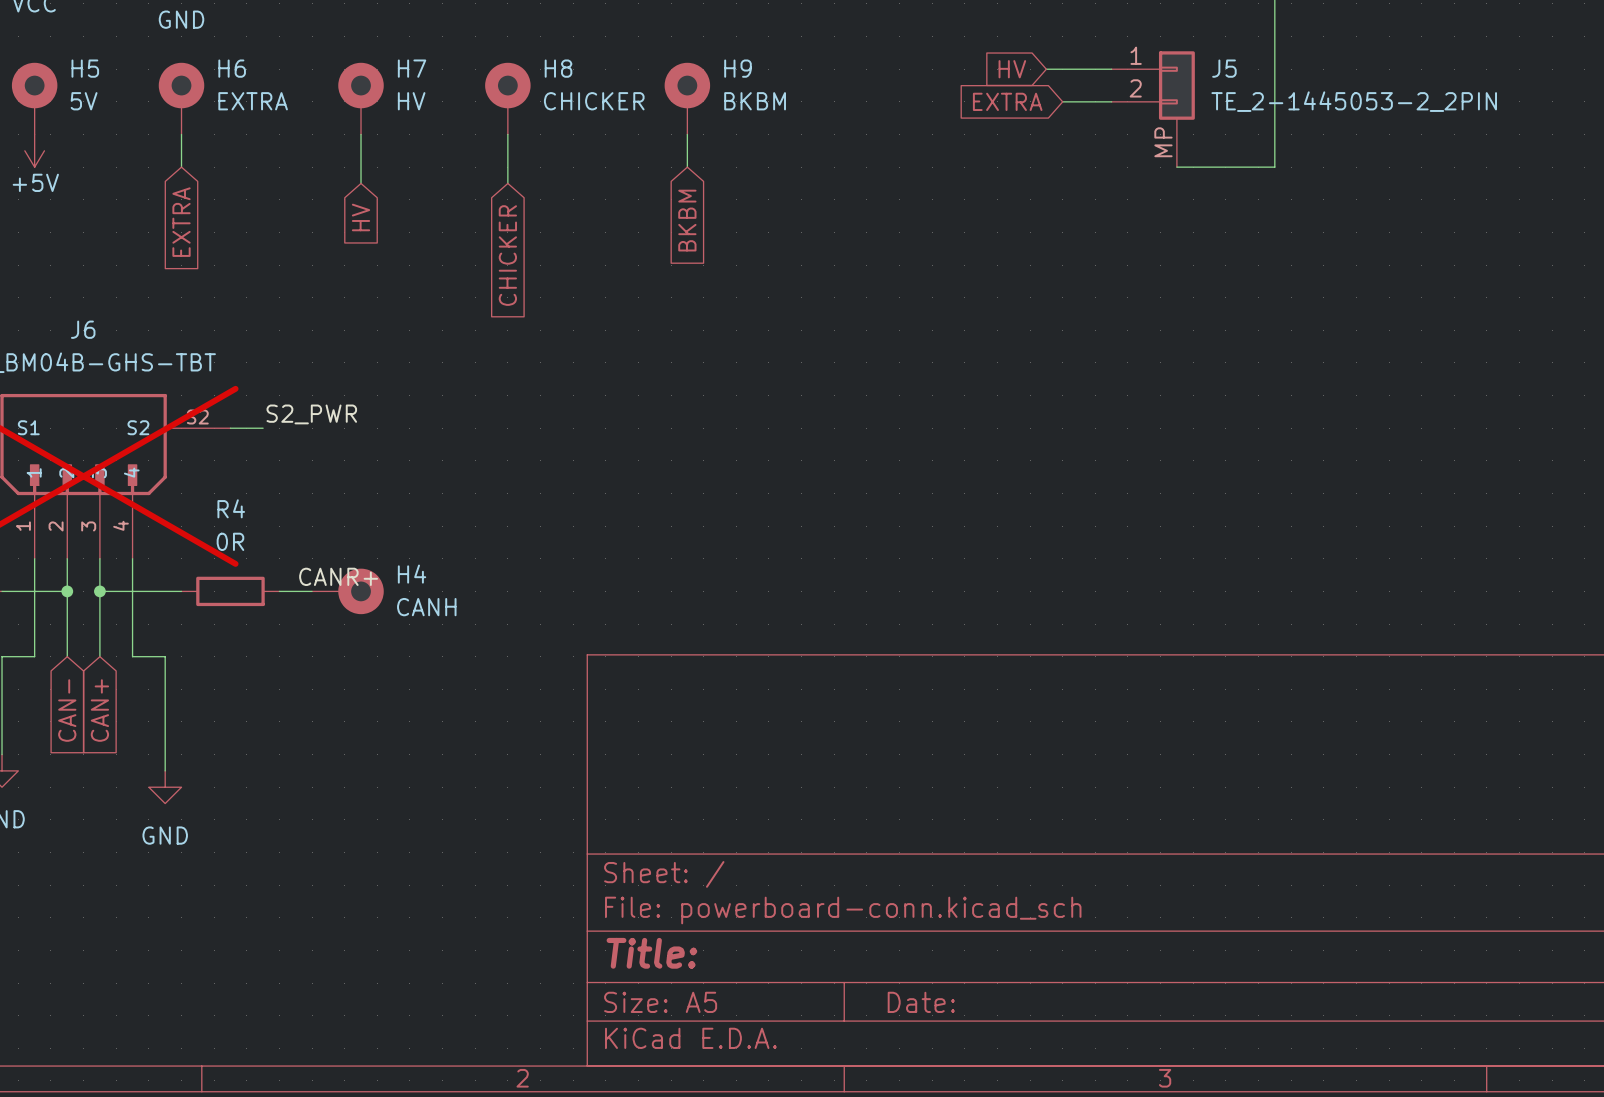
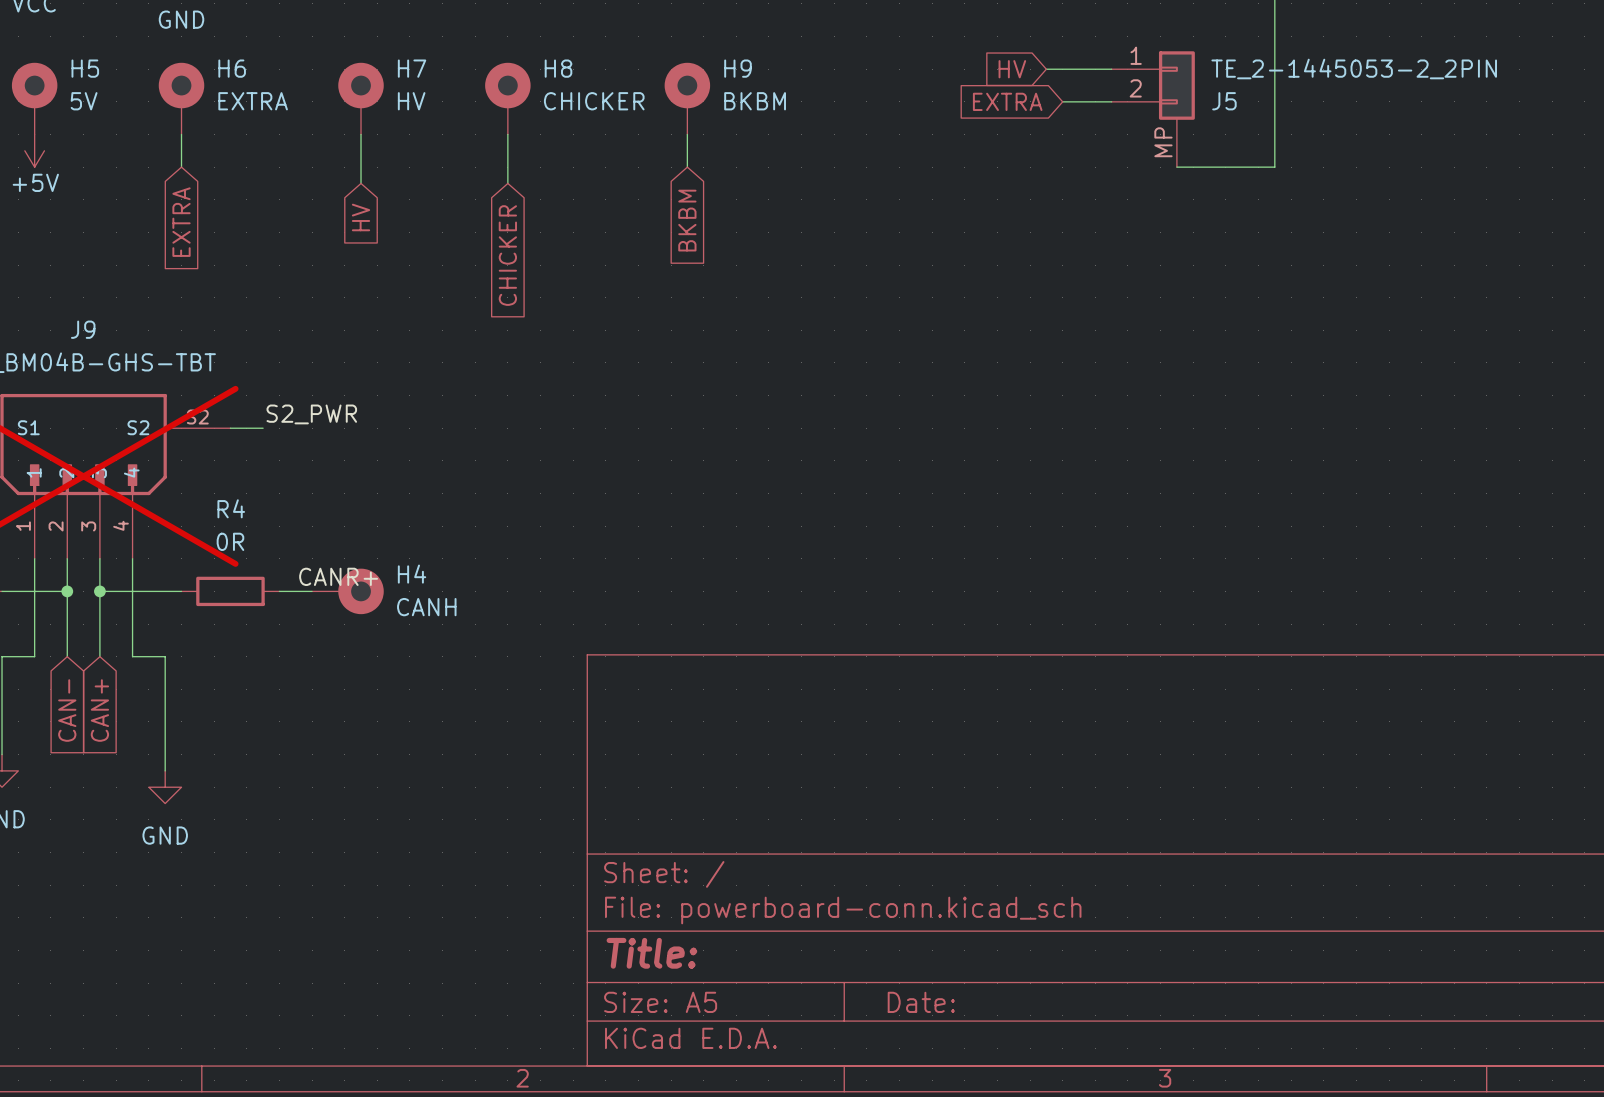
J5 name position: J5 (1224, 68) -> J5 (1224, 101)
J5 value position: TE_2-1445053-2_2PIN (1354, 101) -> TE_2-1445053-2_2PIN (1354, 69)
J6 name: J6 (83, 329) -> J9 (83, 329)

